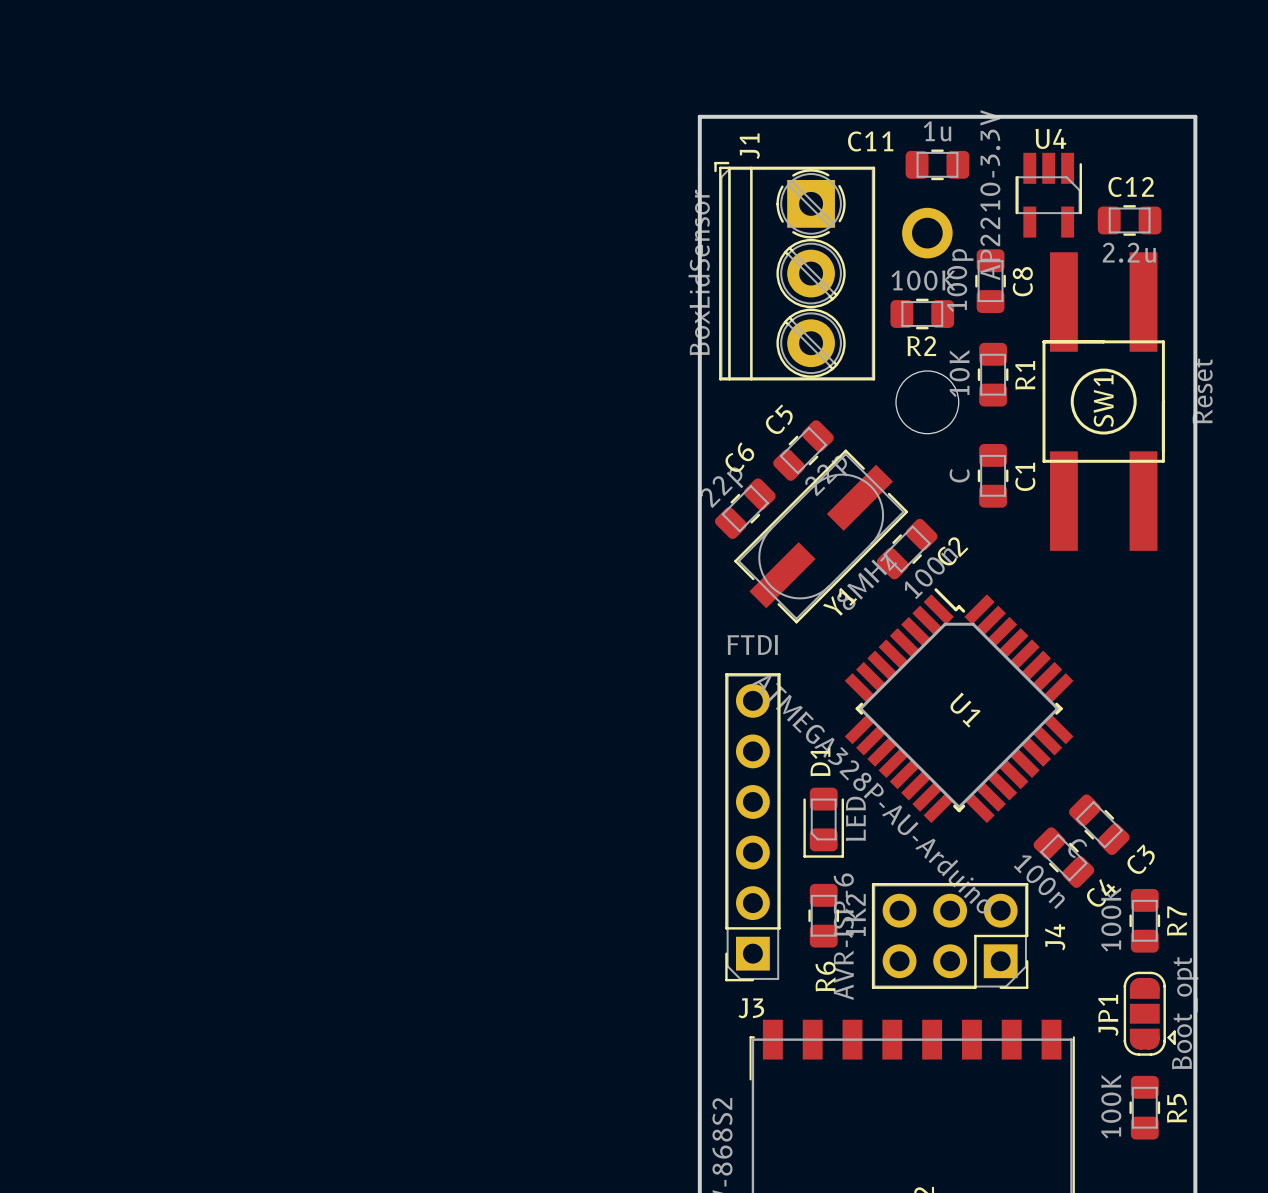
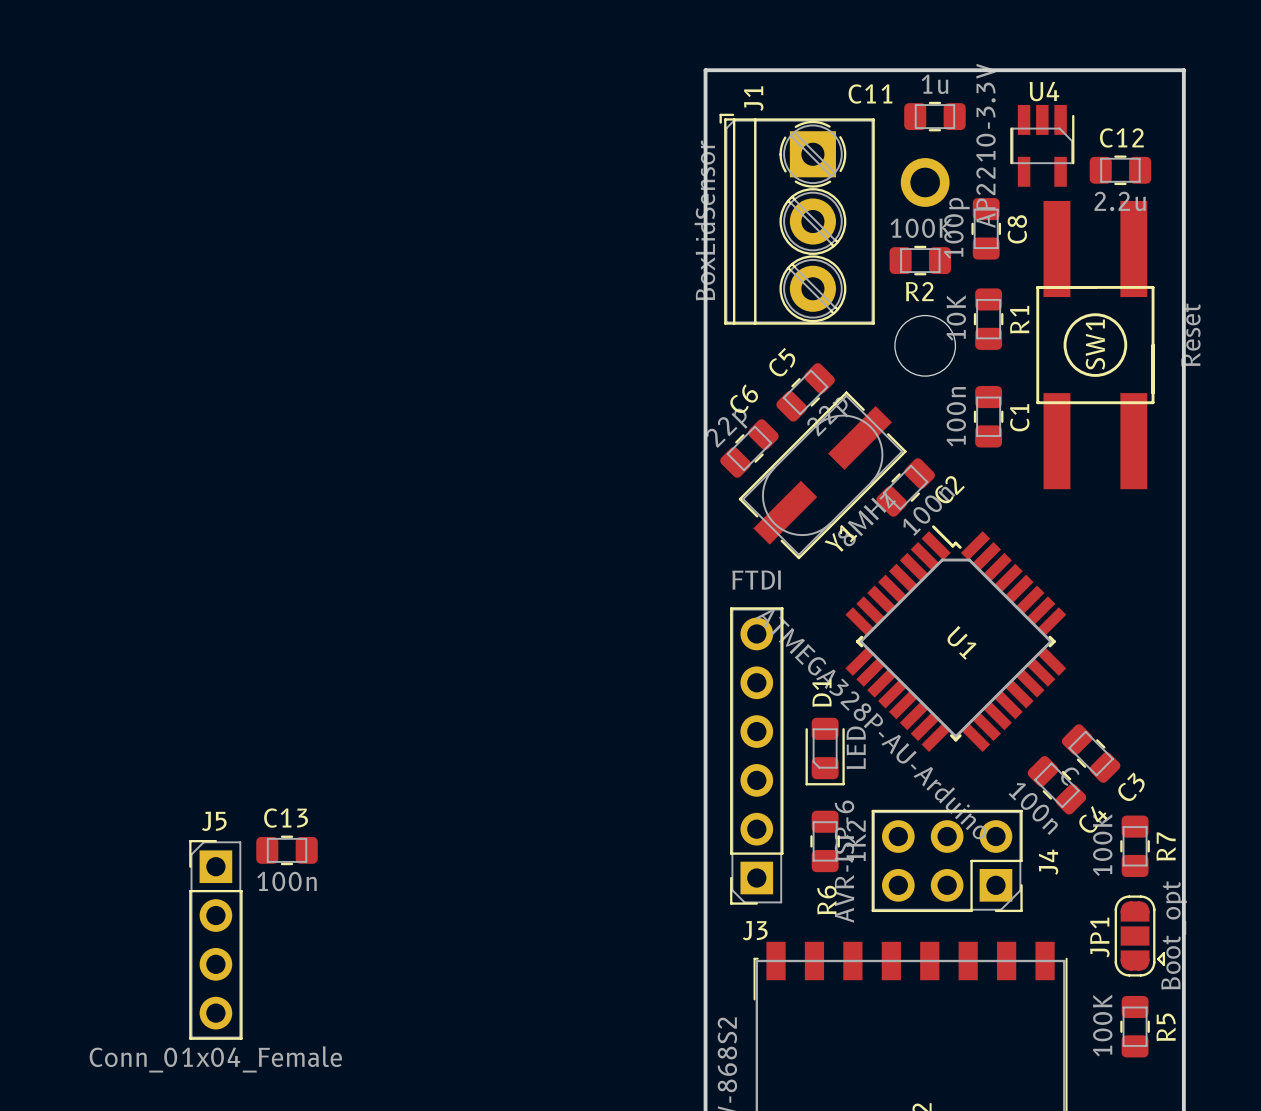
C1 value: C (959, 475) -> 100n (956, 416)
C13: none -> 100n (287, 850)
J5: none -> Conn_01x04_Female (215, 939)

